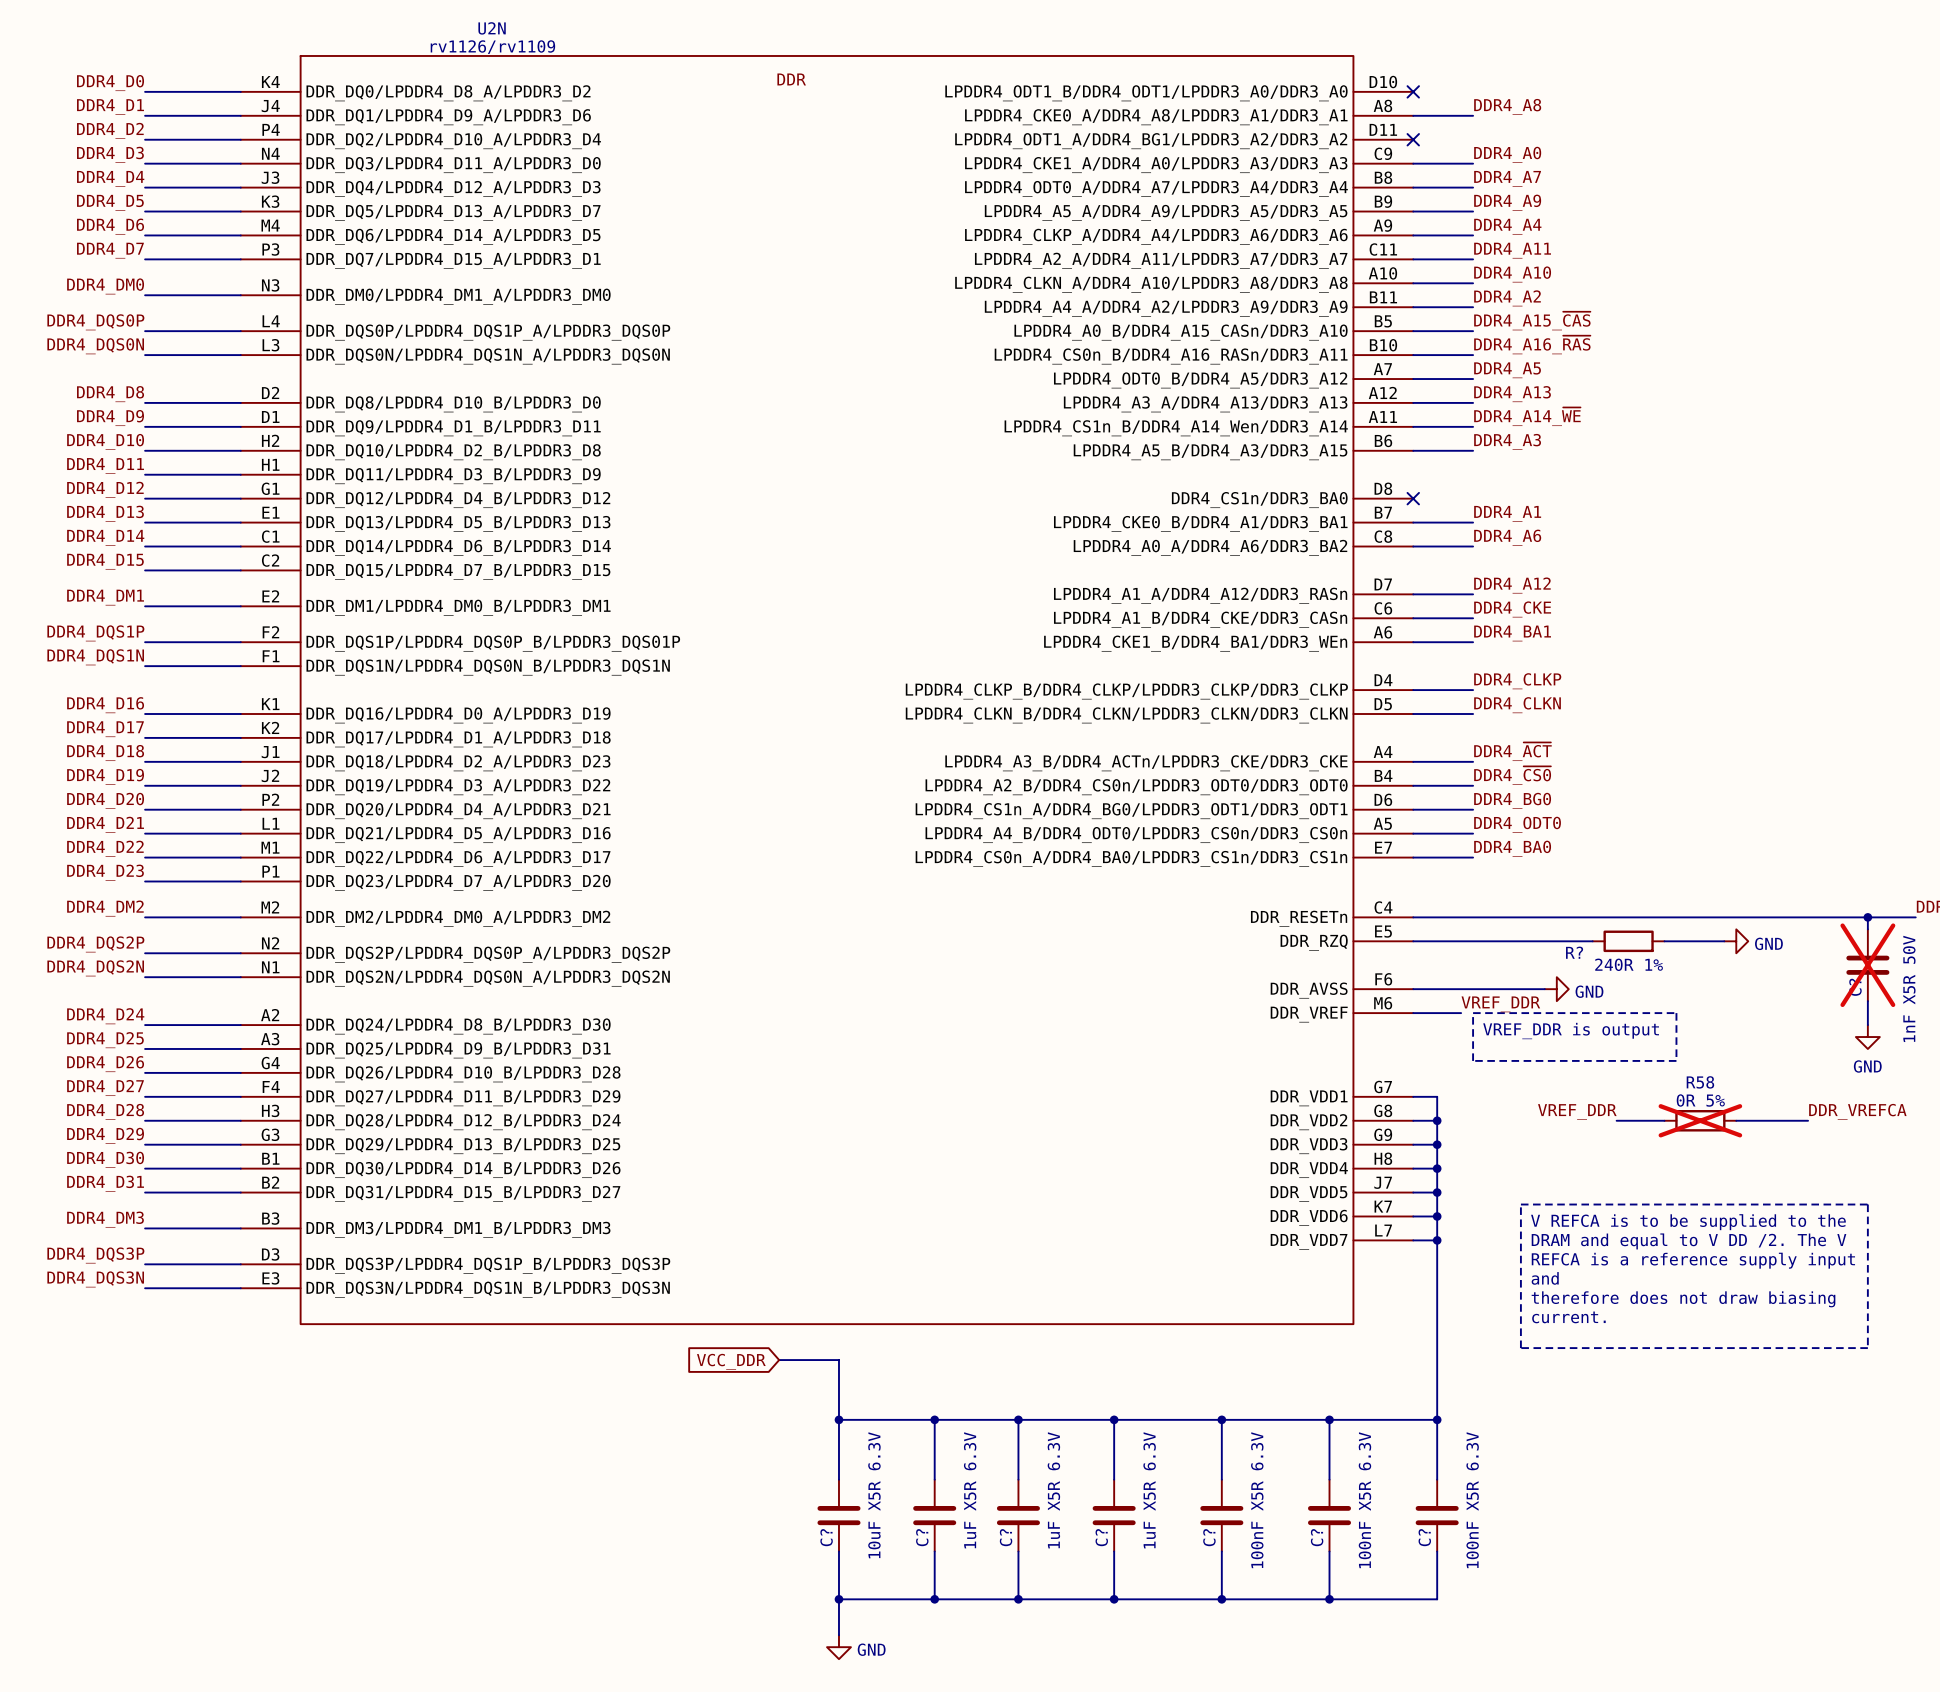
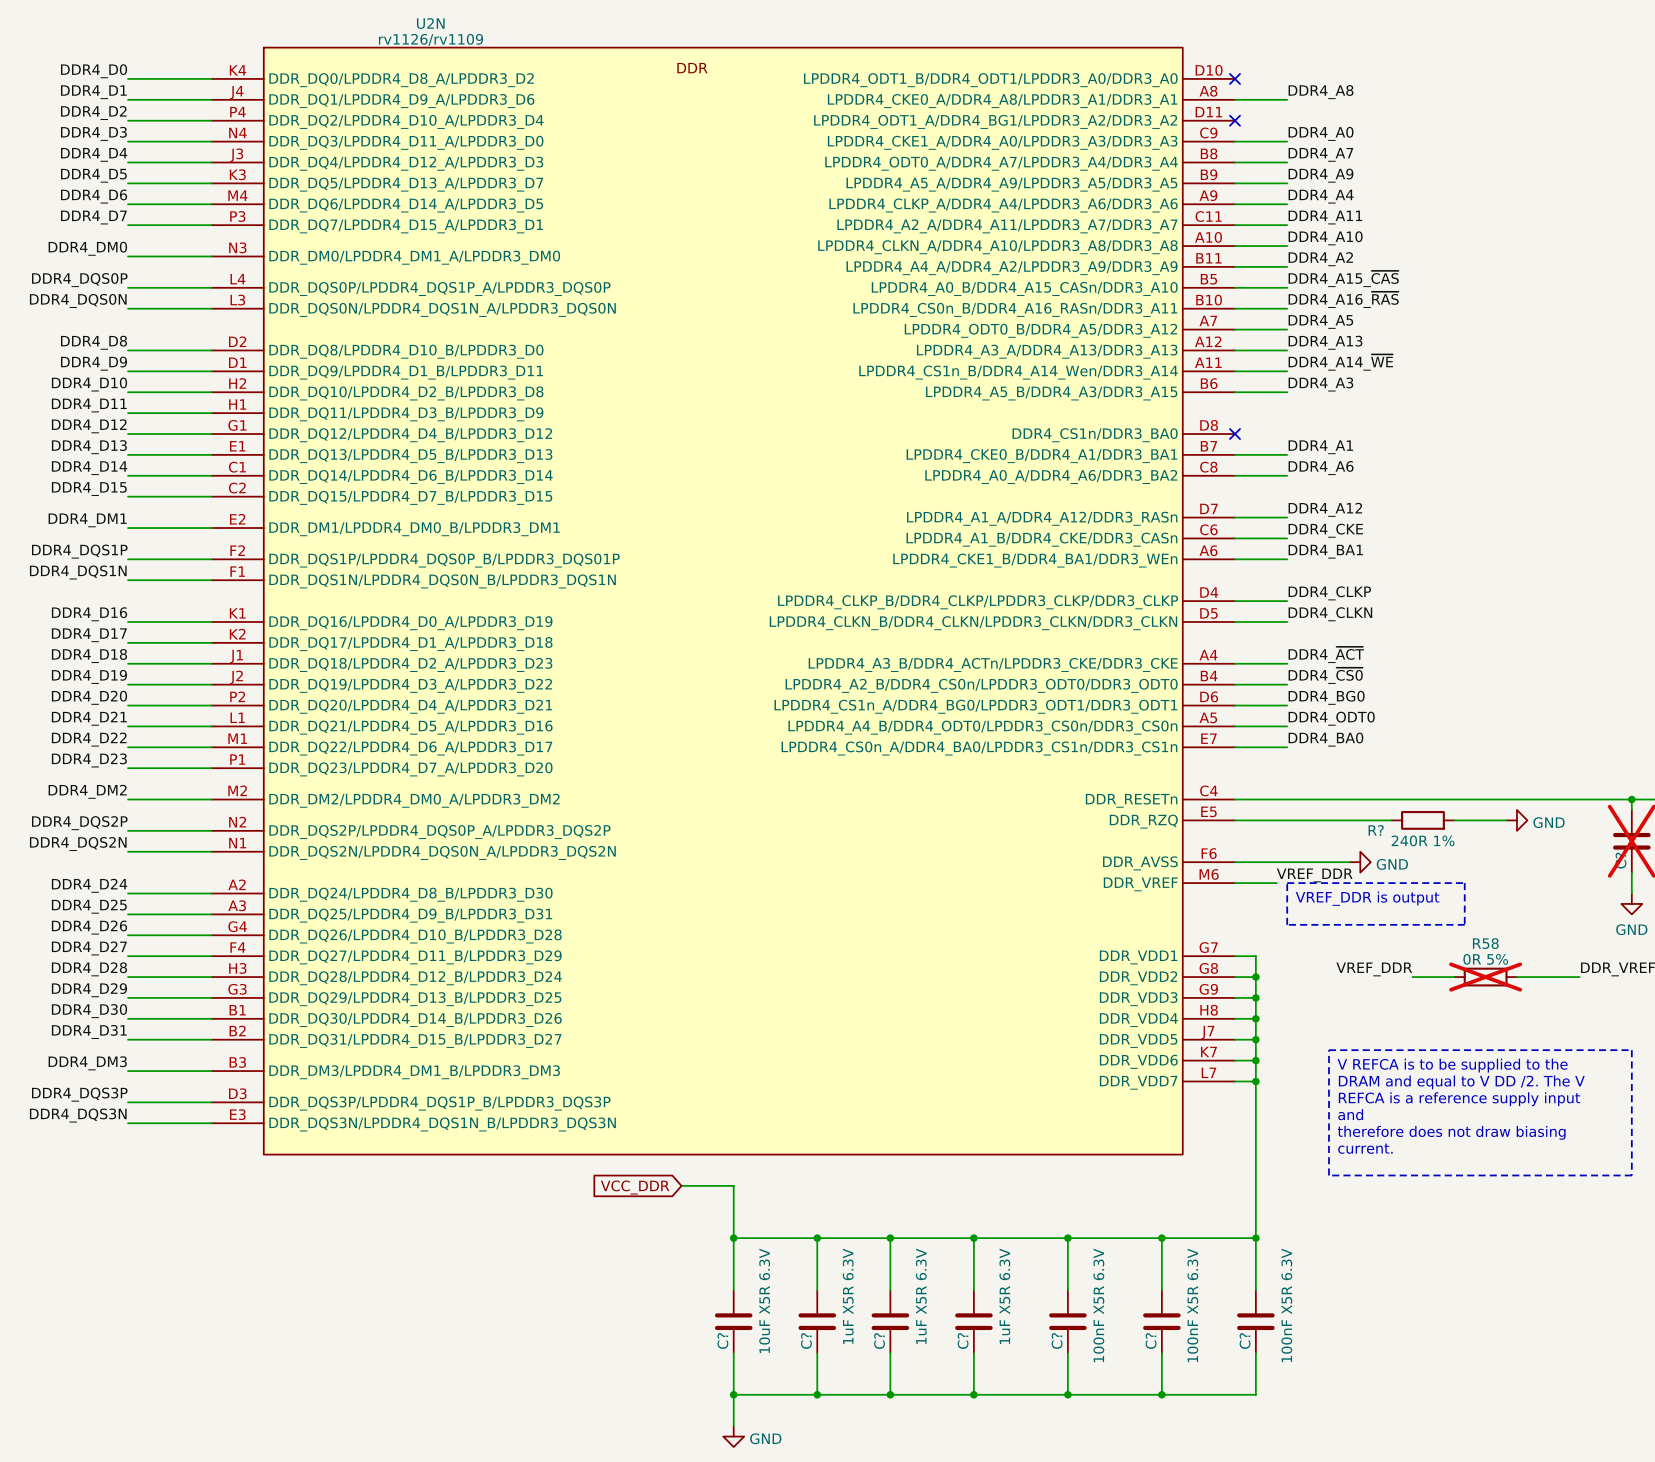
U2N symbol: [240, 55, 1414, 1325] -> [211, 47, 1235, 1155]

